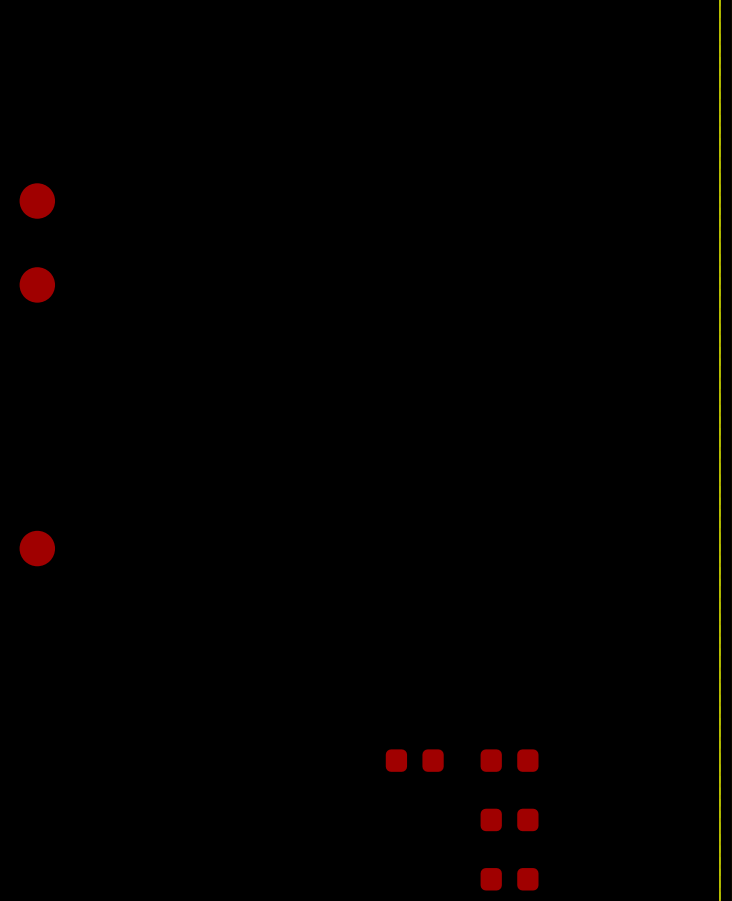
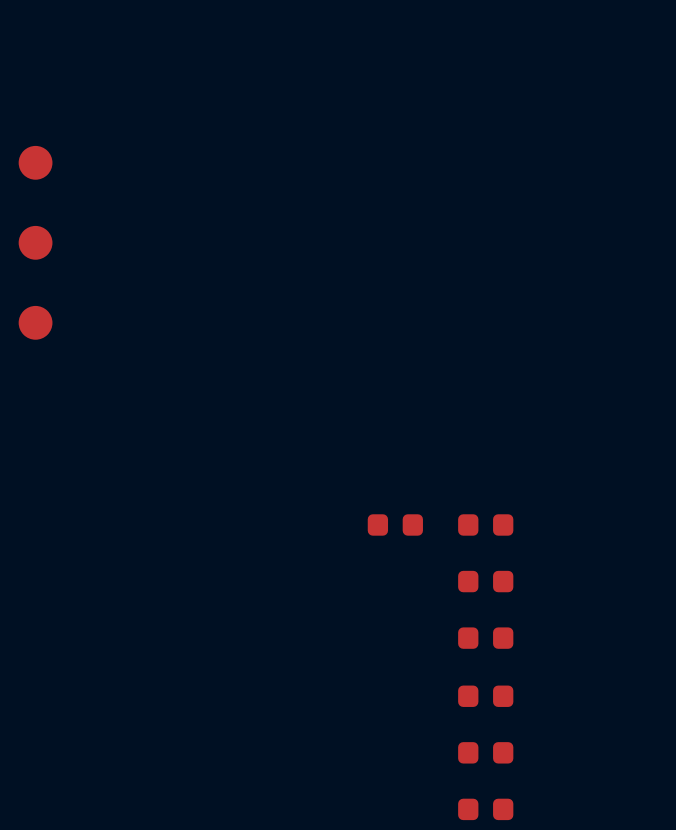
part position: (37, 548) -> (35, 322)
part: none -> (395, 524)
part: none -> (485, 524)
part: none -> (485, 581)
part: none -> (485, 638)
part: (414, 760) -> none

